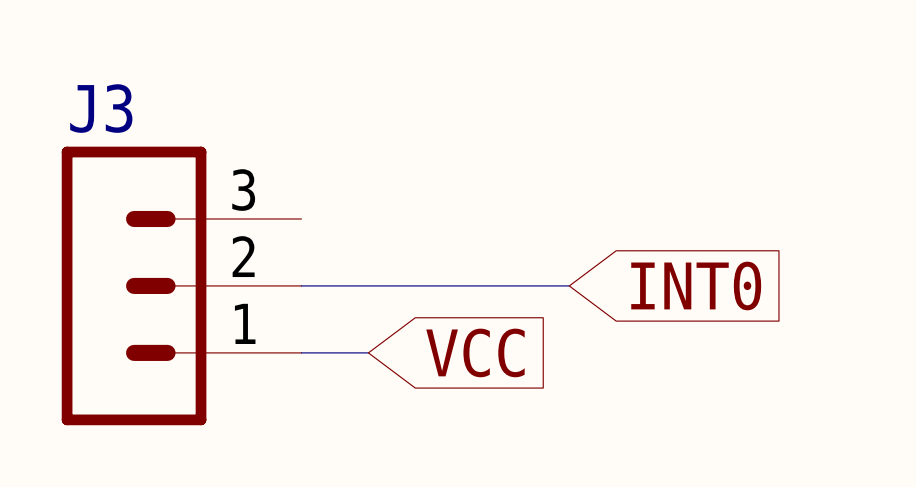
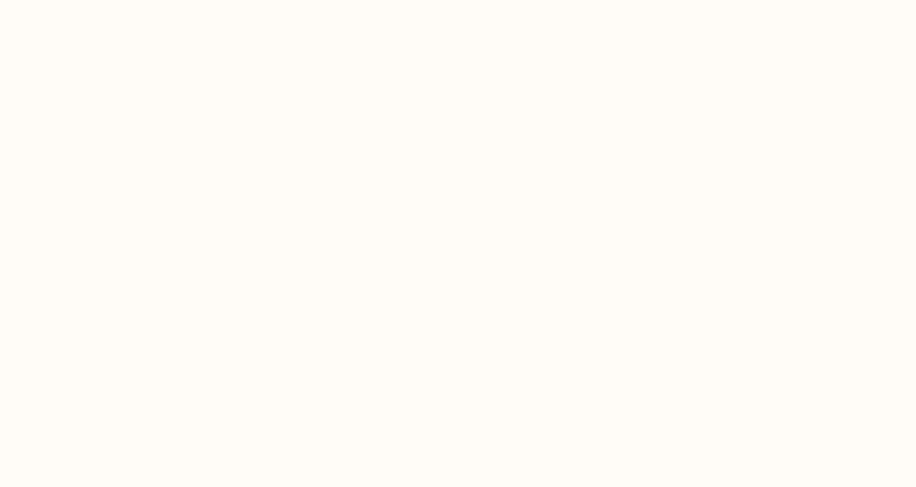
J3: (181, 285) -> none
wire: (301, 285) (569, 285) -> none
global label: INT0 (696, 285) -> none
wire: (301, 352) (368, 352) -> none
global label: VCC (475, 352) -> none

